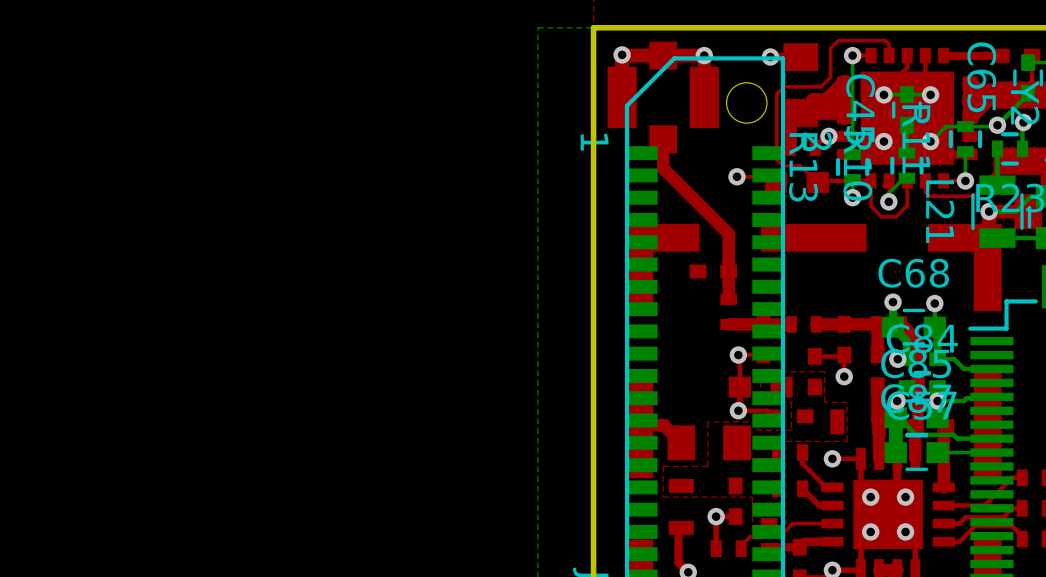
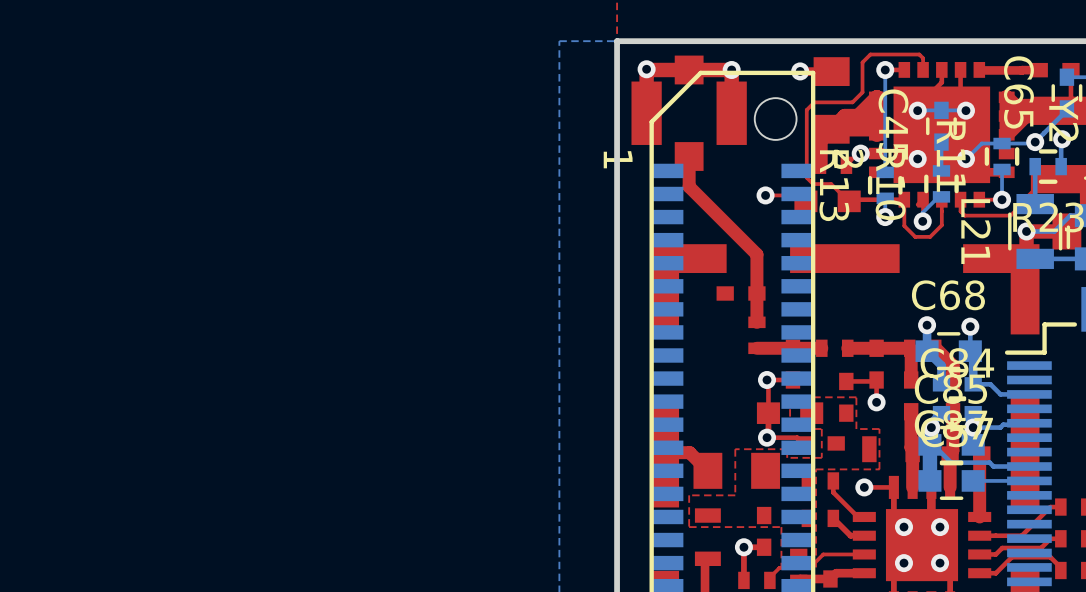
via: (897, 359) -> none

